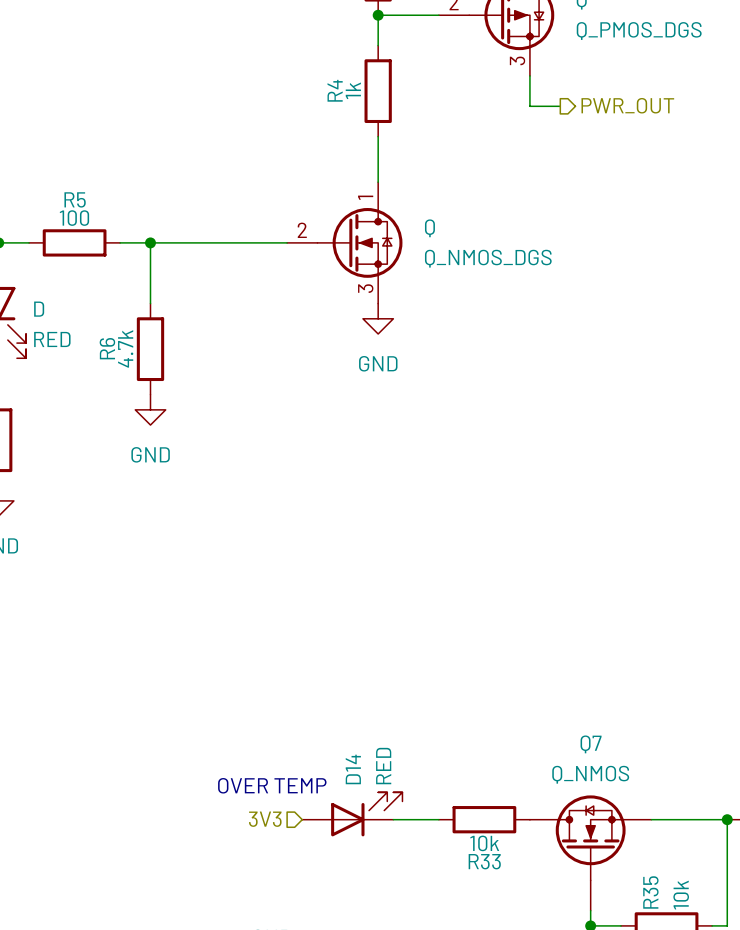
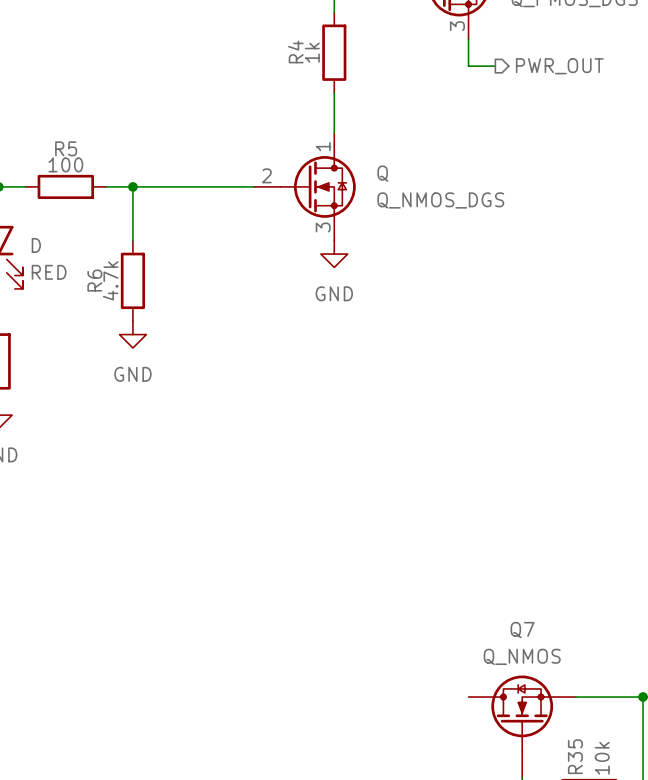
text: OVER TEMP (272, 785) -> none
D14: RED (352, 814) -> none
hierarchical label: 3V3 (265, 819) -> none
wire: (393, 819) (438, 819) -> none
R33: 10k (484, 819) -> none

